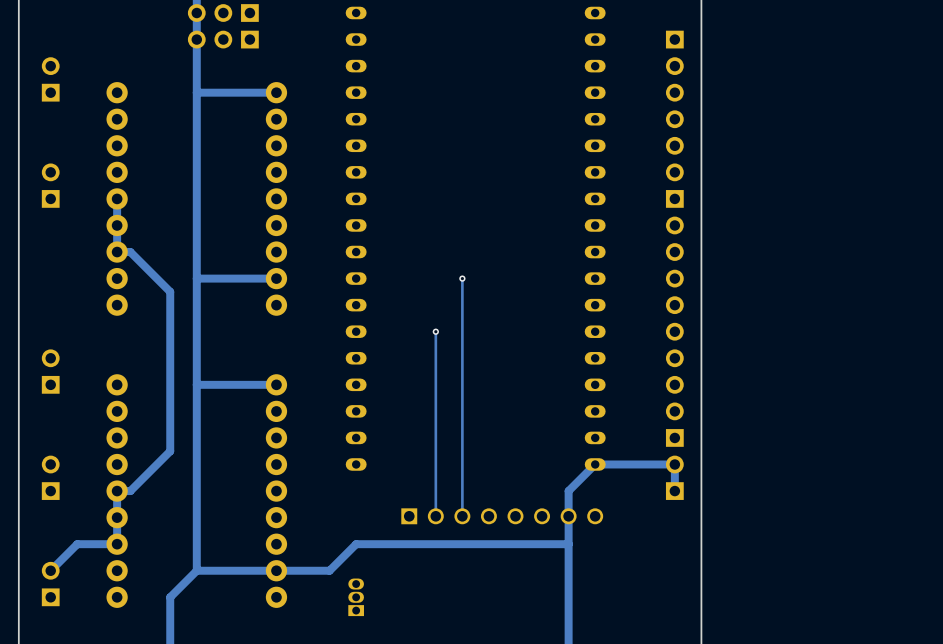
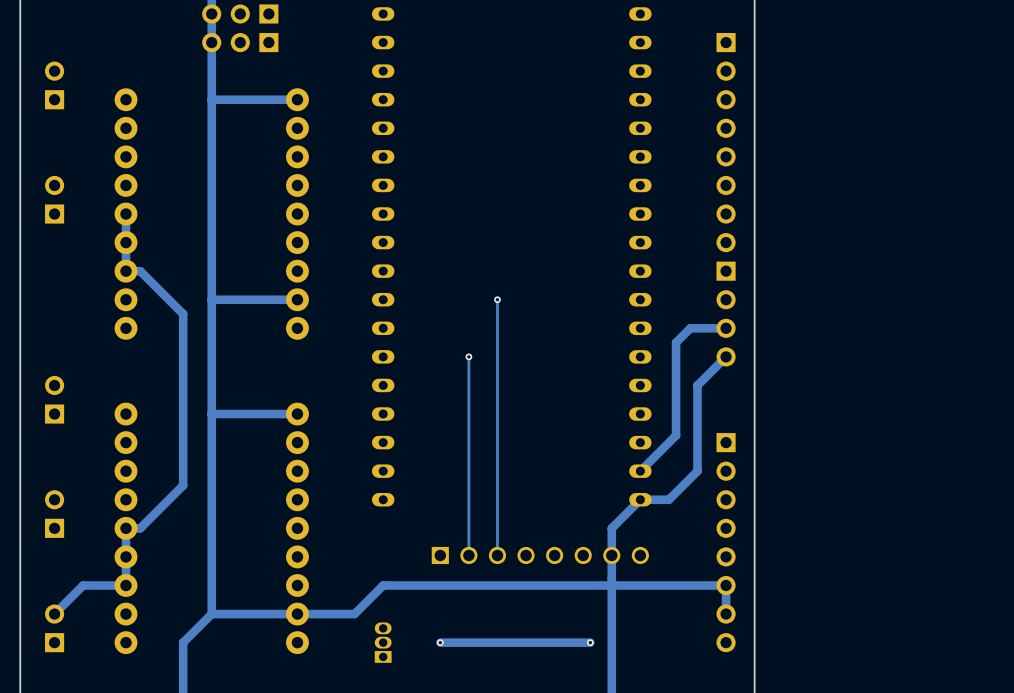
part: none -> (726, 142)
part footprint: [665, 190, 684, 394] -> [716, 261, 736, 367]
track: none -> (726, 328) (690, 328) (676, 342) (676, 435) (640, 471)
part: (674, 424) -> none
track: (621, 464) (674, 464) (674, 491) -> (668, 499) (697, 471) (697, 385) (726, 356)
part: (674, 477) -> none
part: none -> (726, 542)
track: none -> (611, 585) (726, 585) (726, 614)
via: none -> (440, 642)
track: none -> (590, 642) (440, 642)
via: none -> (590, 642)

